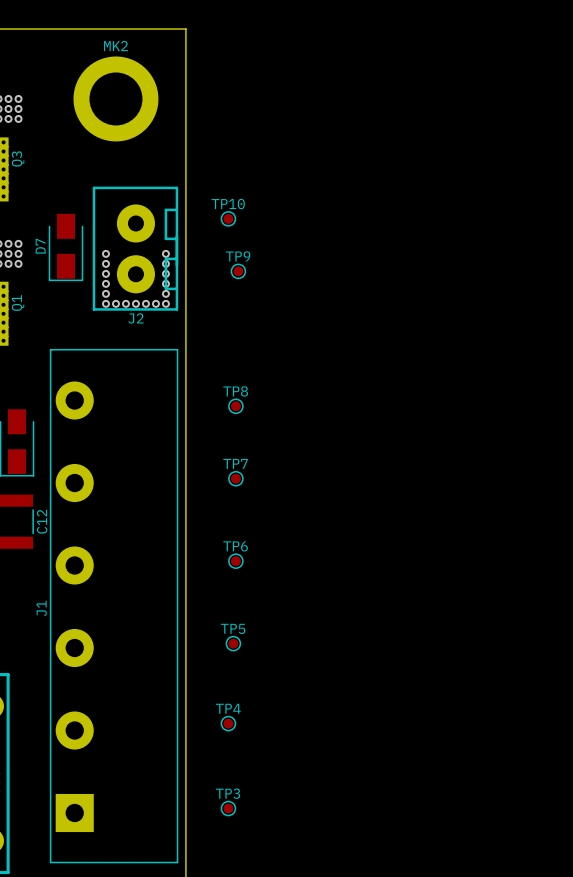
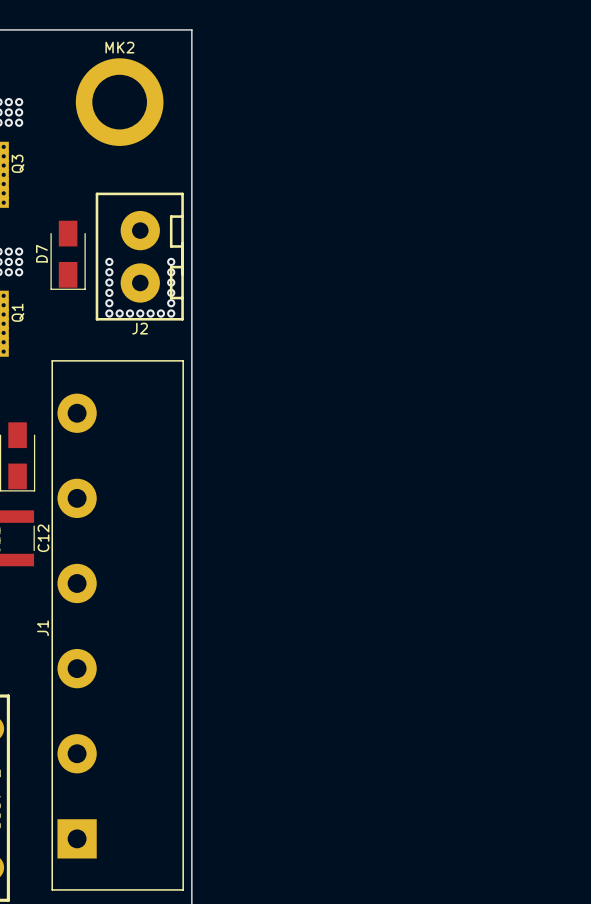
TP10: (228, 218) -> none
TP9: (238, 271) -> none
TP8: (235, 406) -> none
TP7: (235, 478) -> none
TP6: (235, 561) -> none
TP5: (233, 643) -> none
TP4: (228, 723) -> none
TP3: (228, 808) -> none

